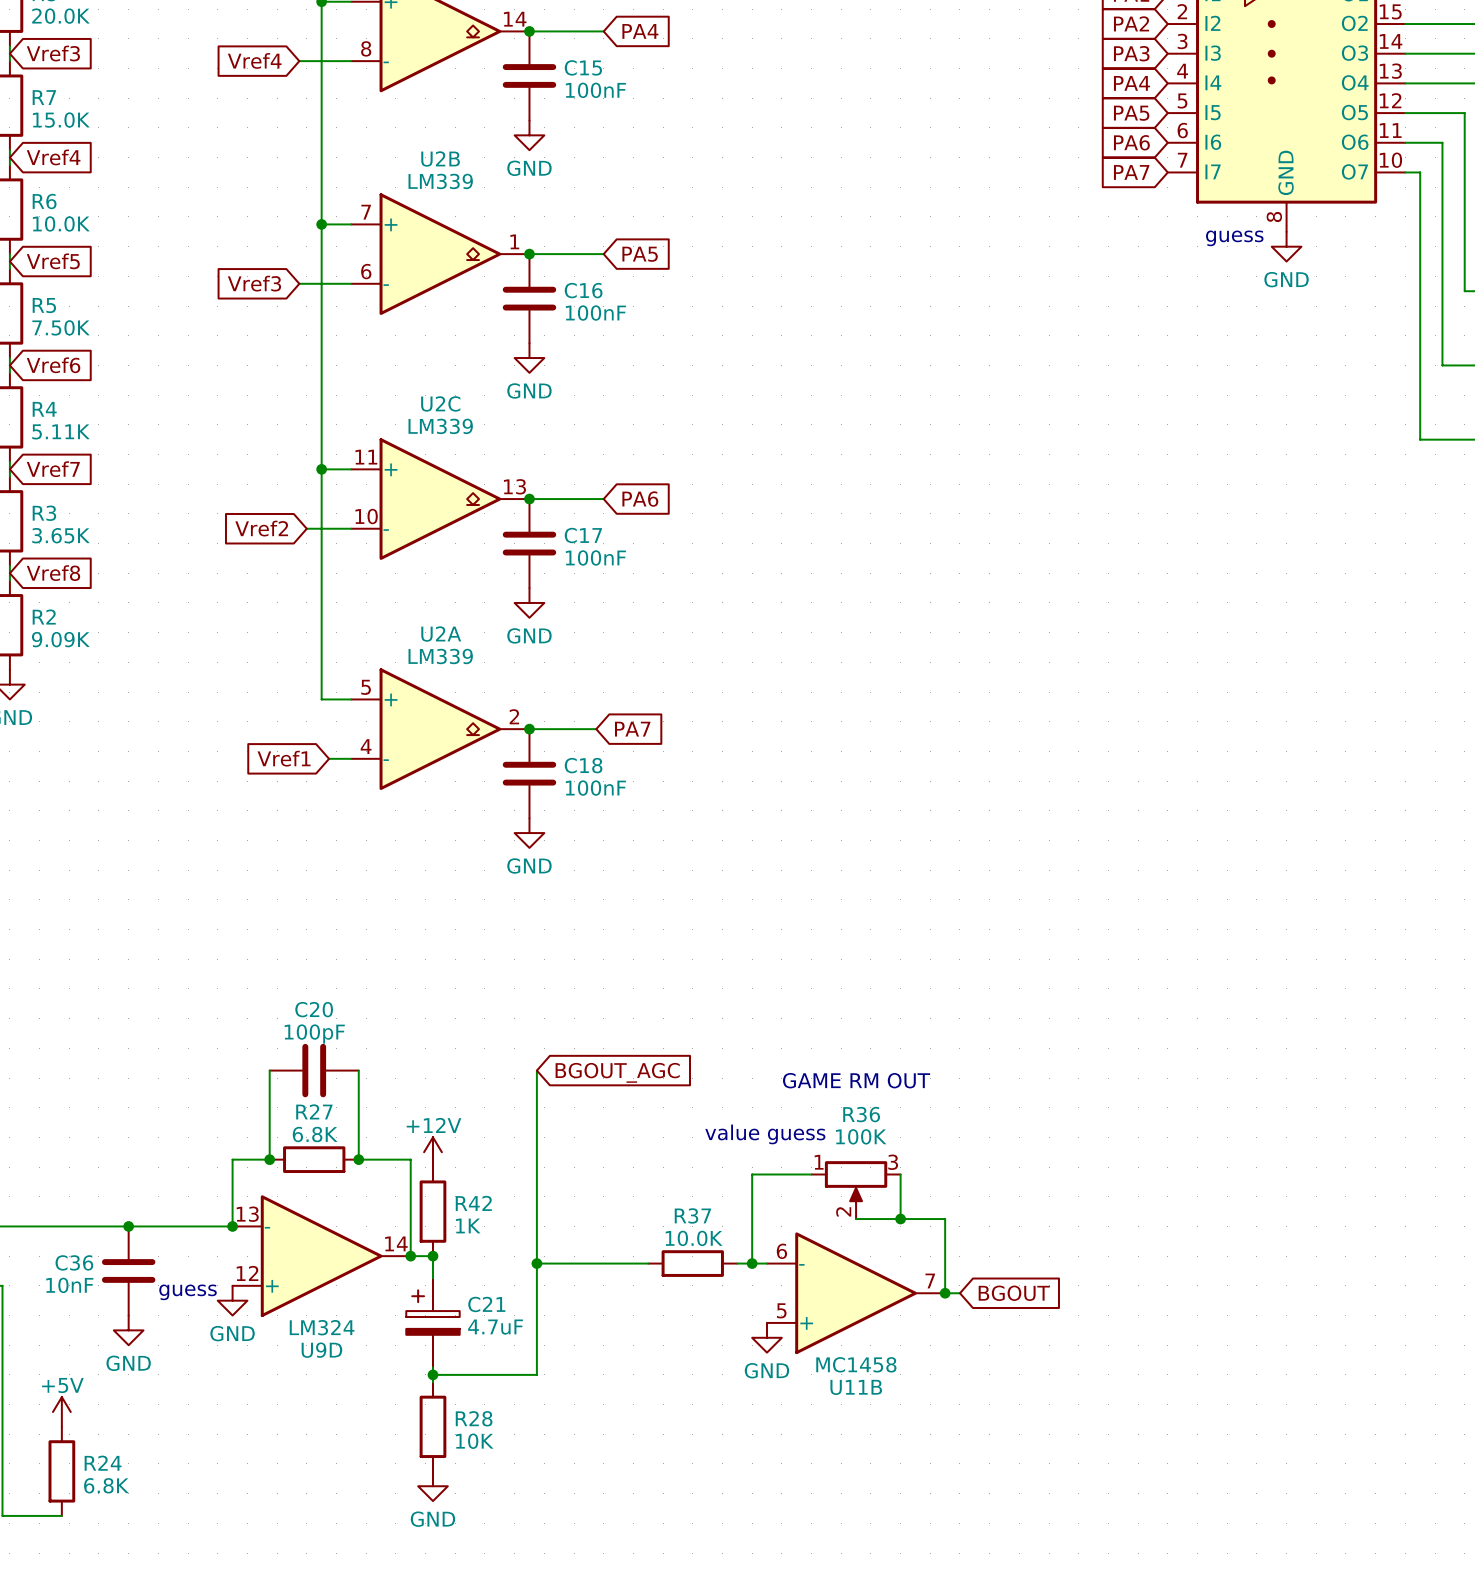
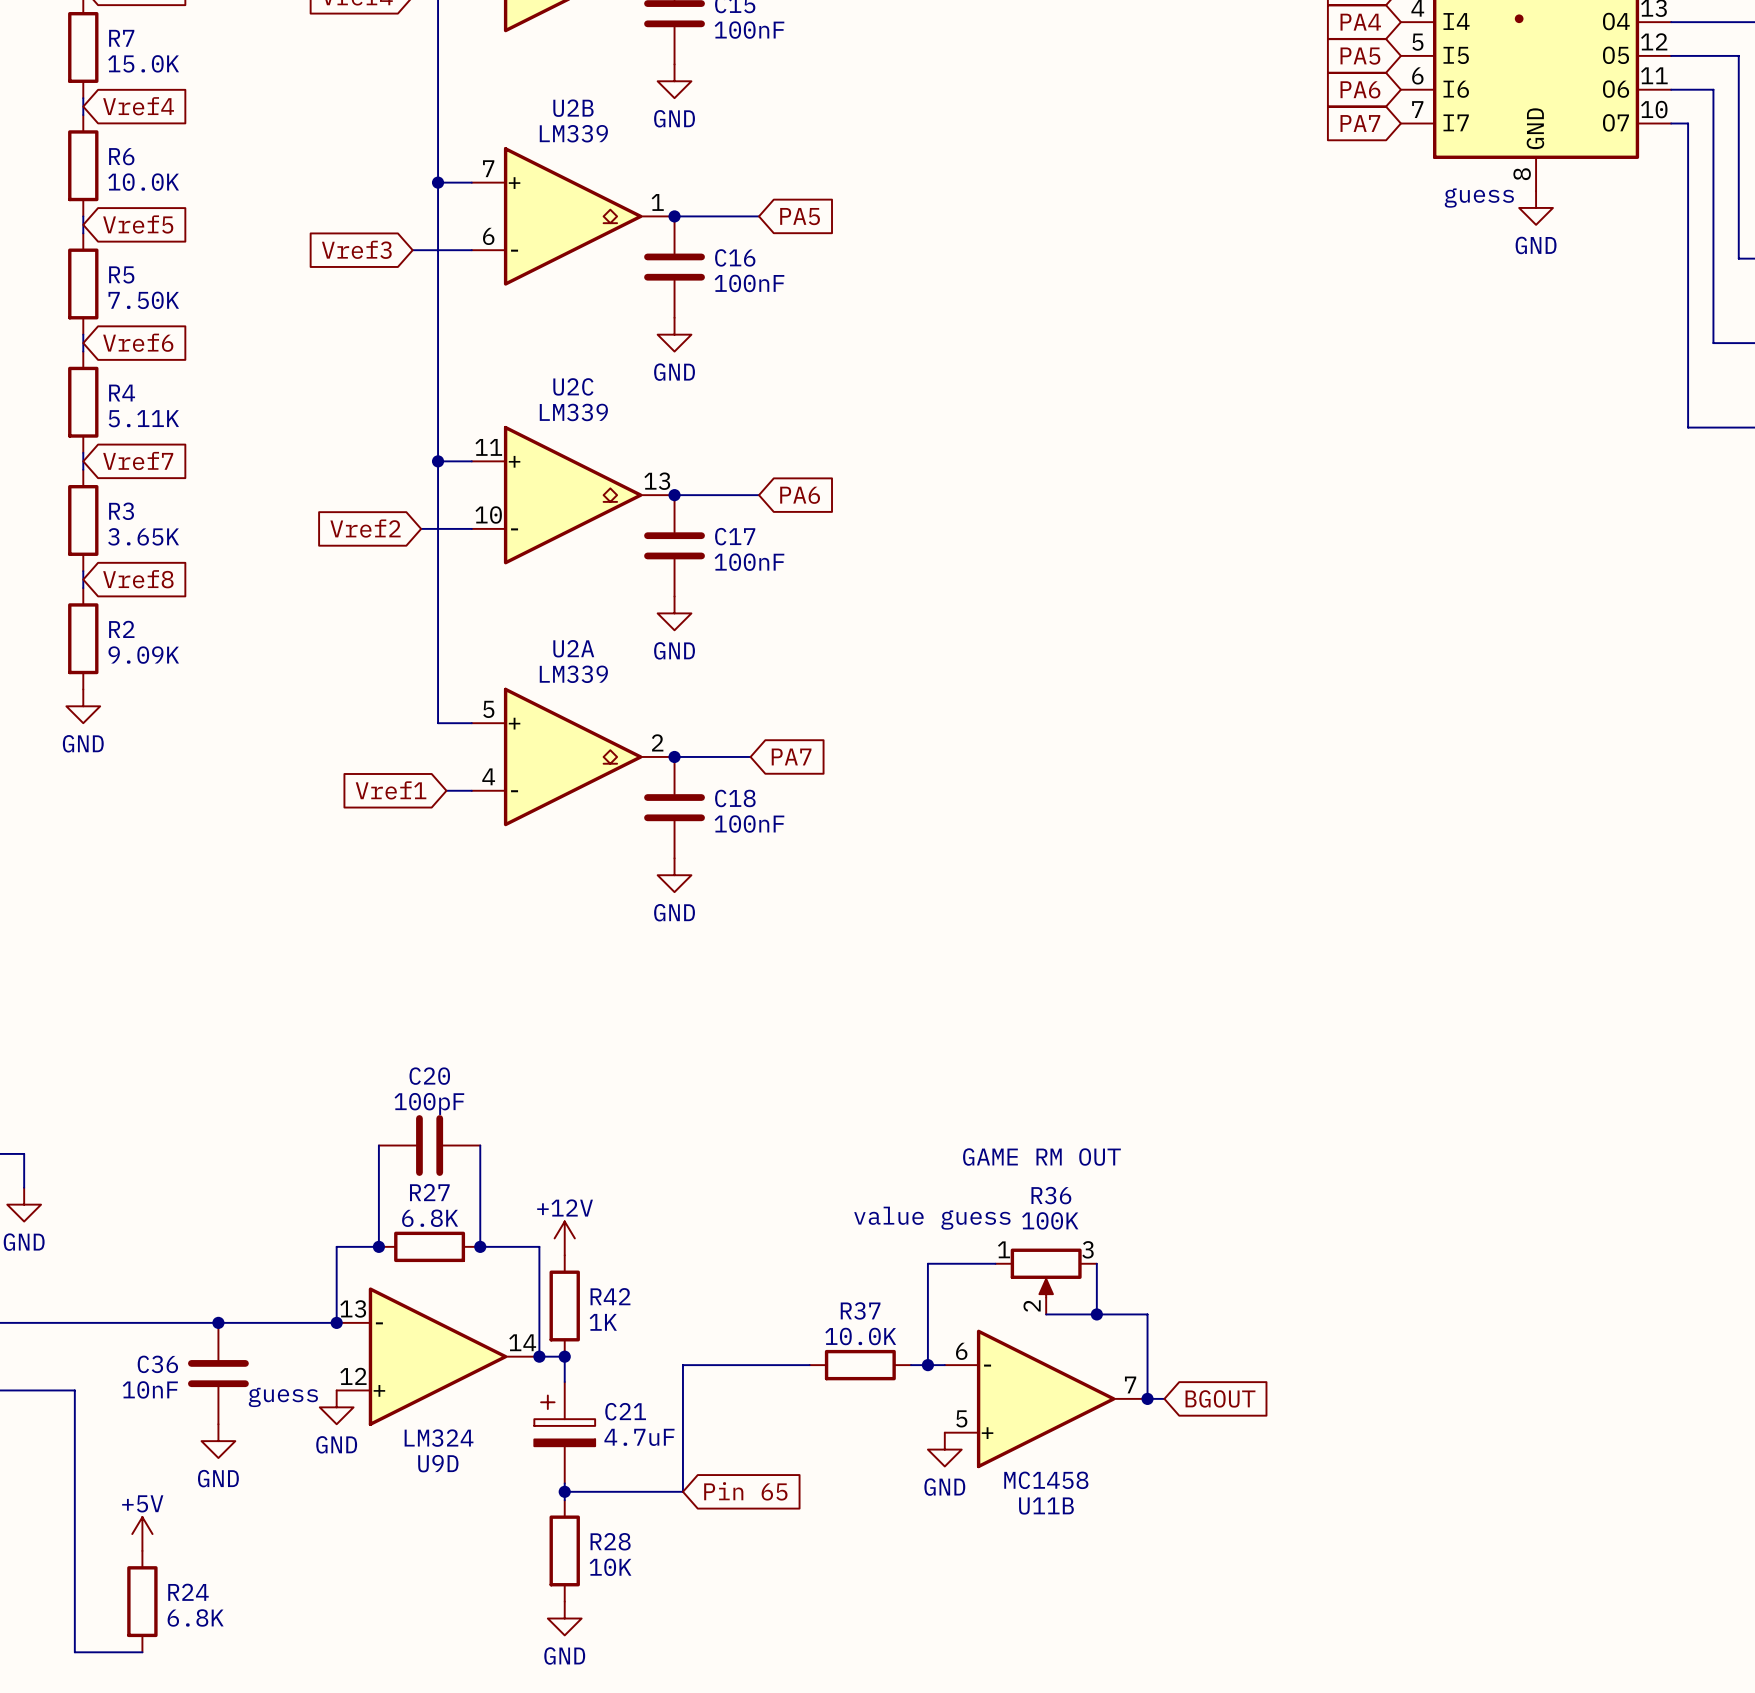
wire: (536, 1070) (536, 1263) -> none
global label: BGOUT_AGC (617, 1072) -> none
junction: (536, 1263) -> none
global label: none -> Pin 65 (745, 1491)

